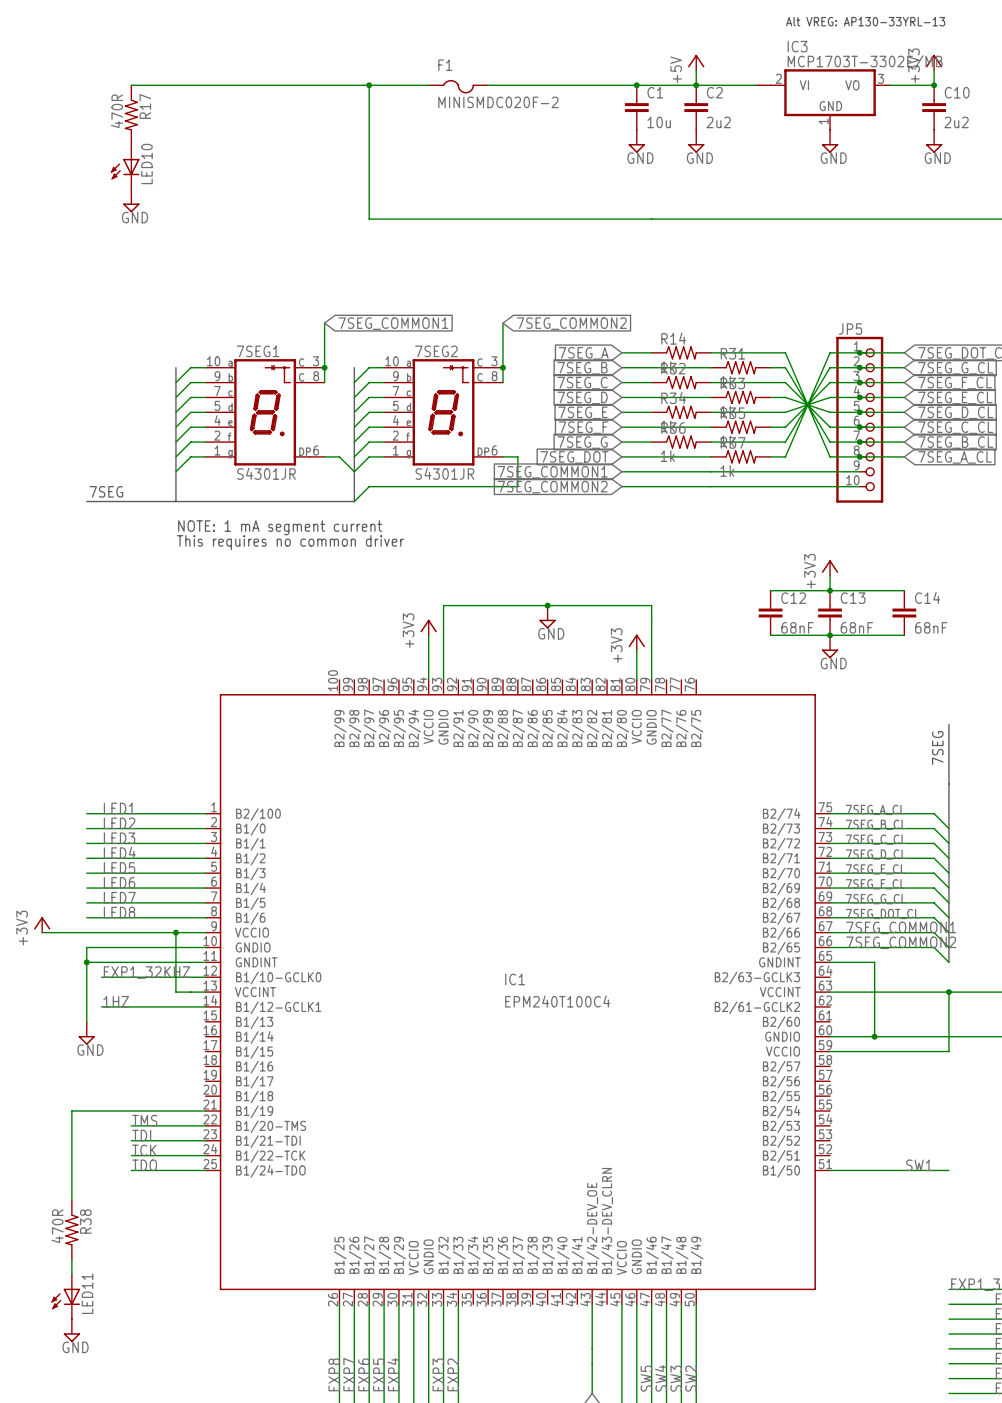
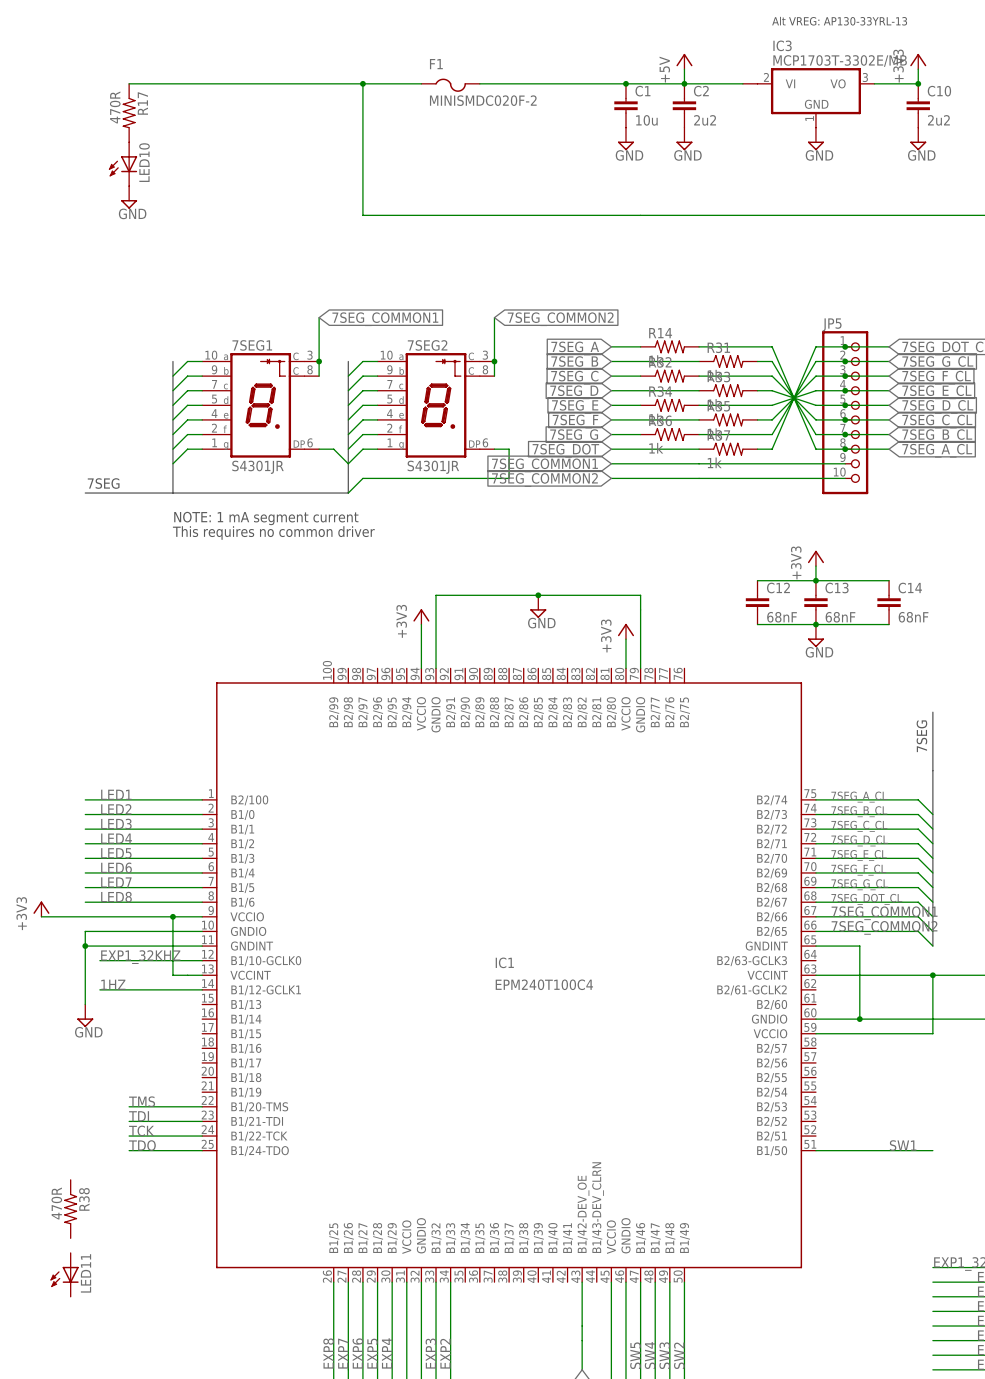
wire: (205, 1111) (71, 1111) (71, 1200) -> none
wire: (71, 1259) (71, 1274) -> none
power symbol: GND (71, 1330) -> none

